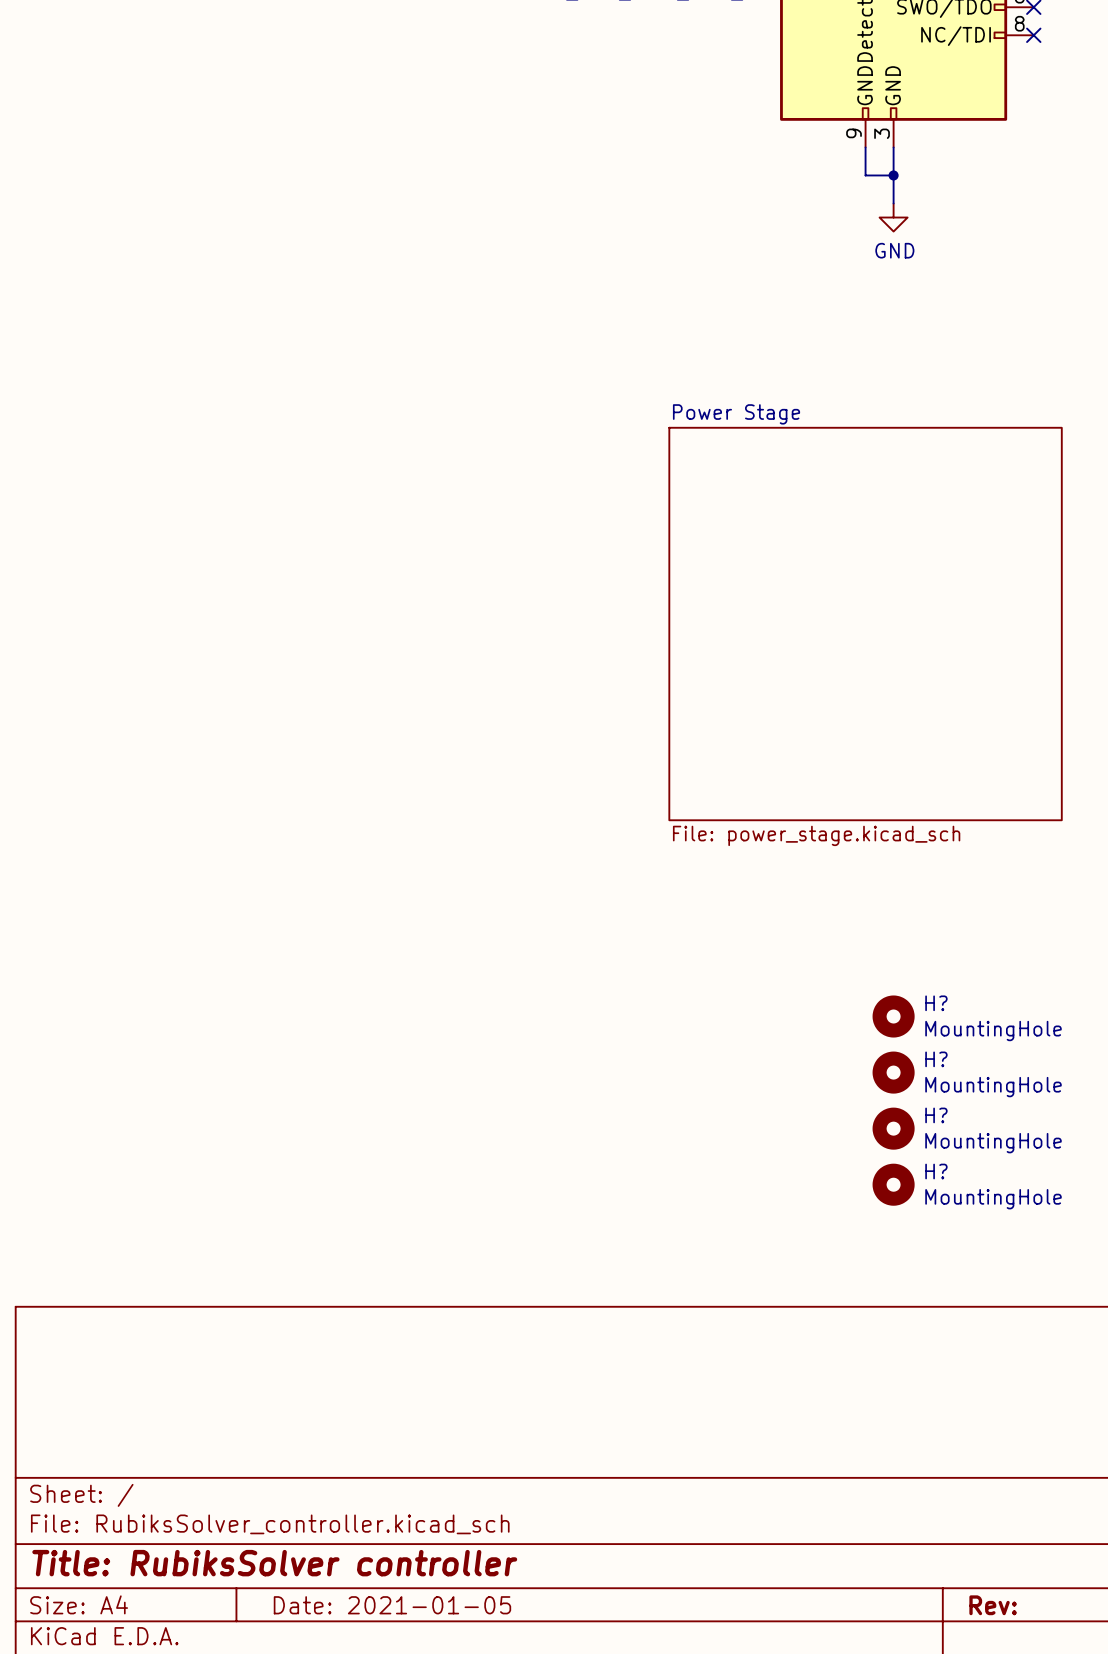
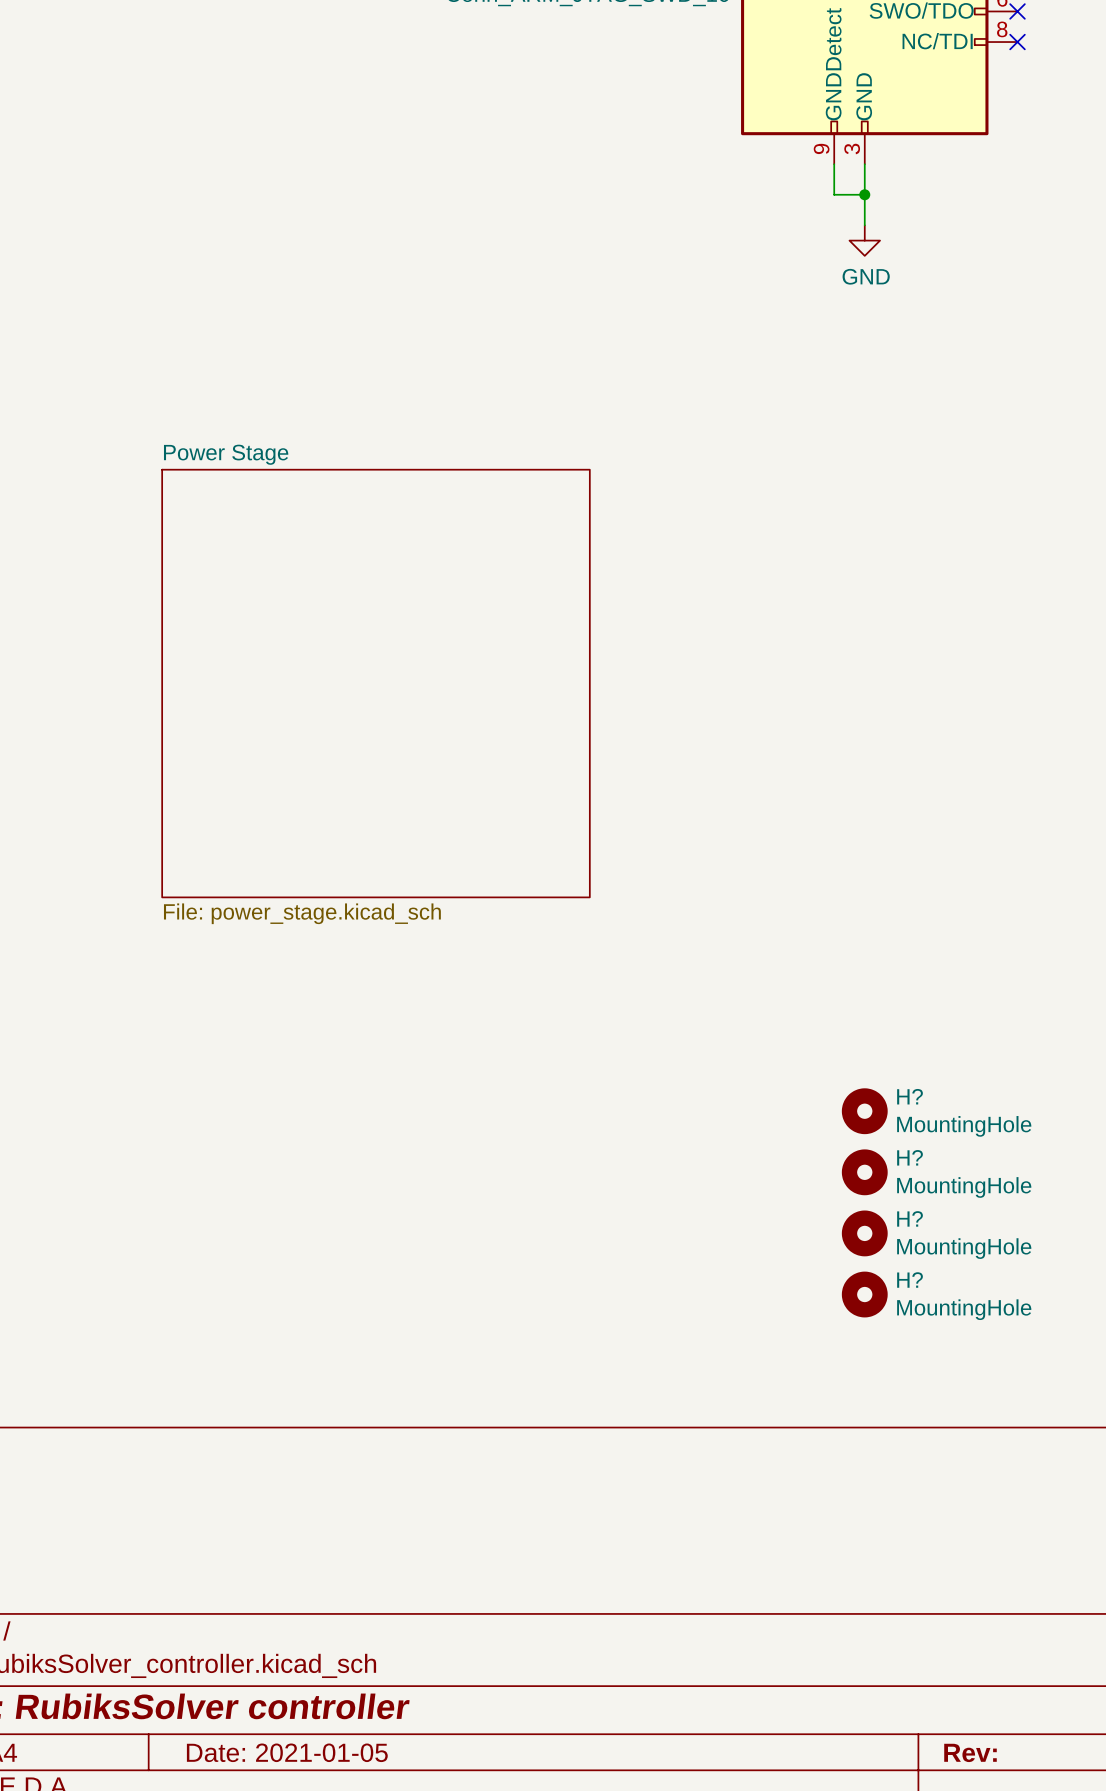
sheet Power Stage: none -> File: power_stage.kicad_sch (375, 683)
sheet Power Stage: File: power_stage.kicad_sch (865, 624) -> none

